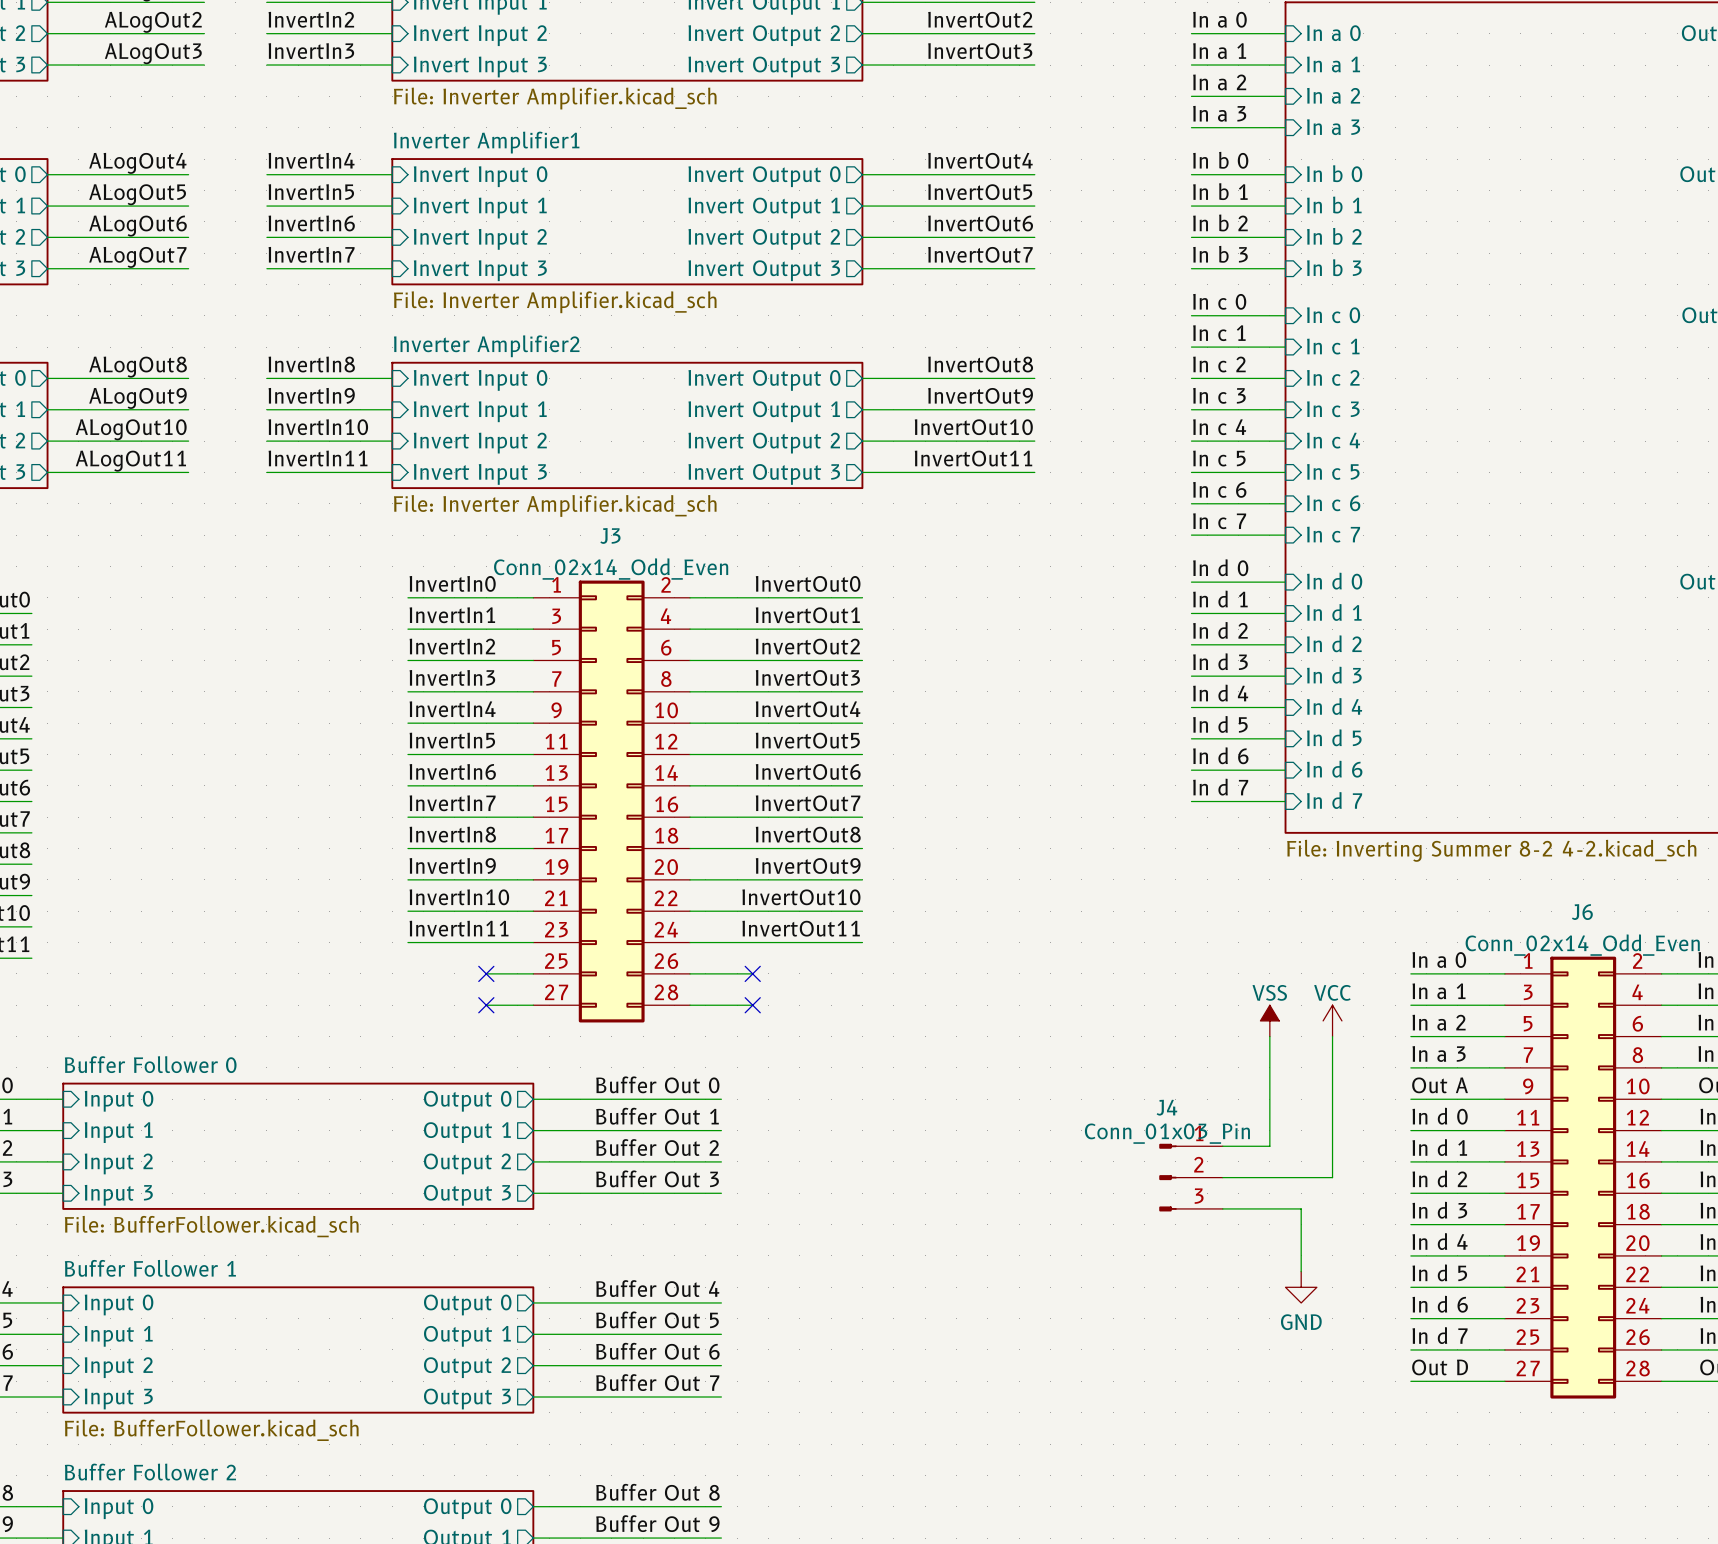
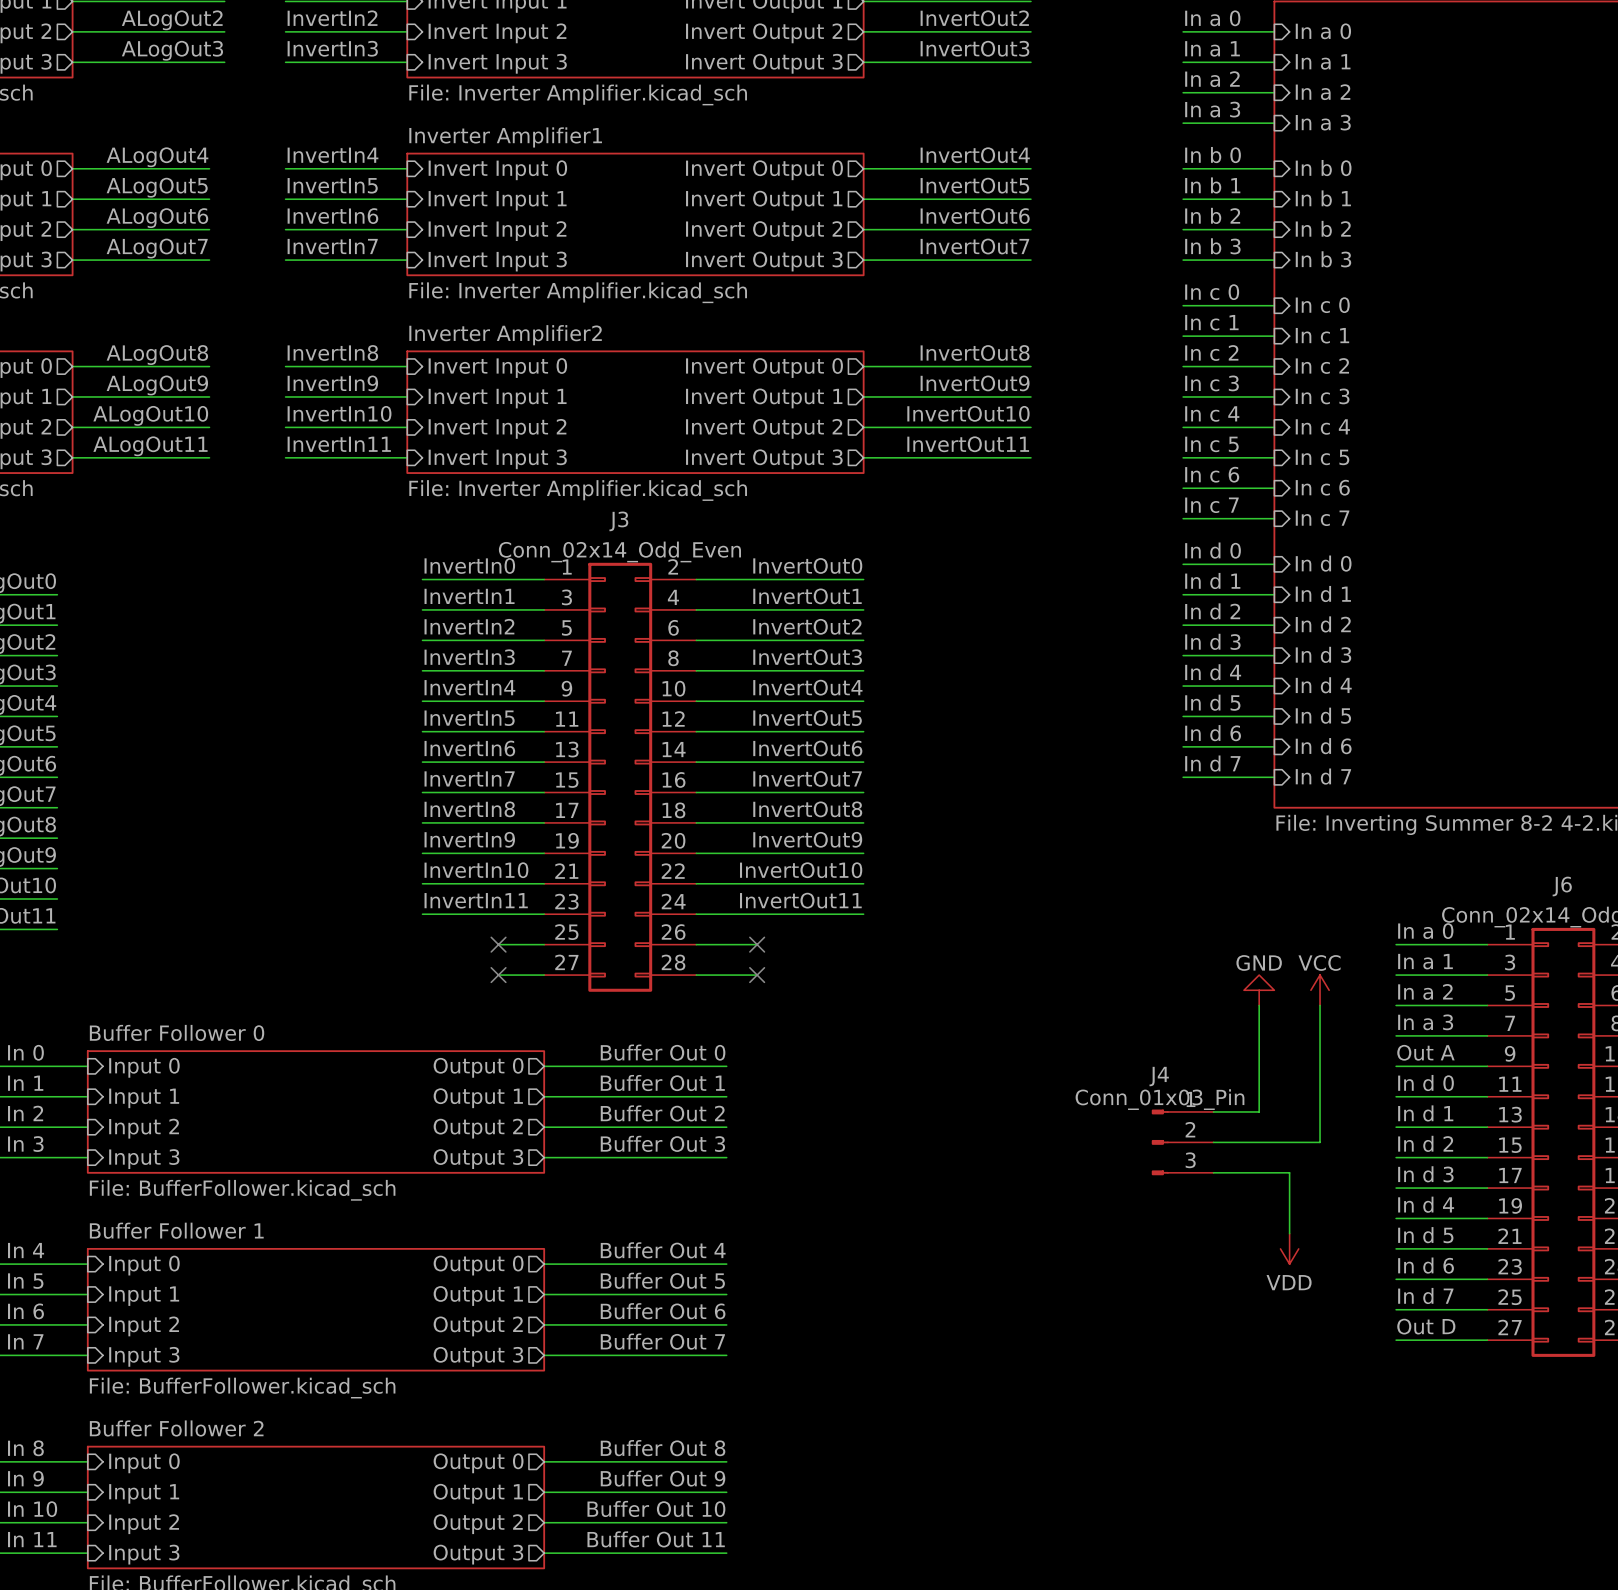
power symbol: VSS (1269, 1020) -> GND (1259, 990)
power symbol: GND (1301, 1287) -> VDD (1289, 1248)

